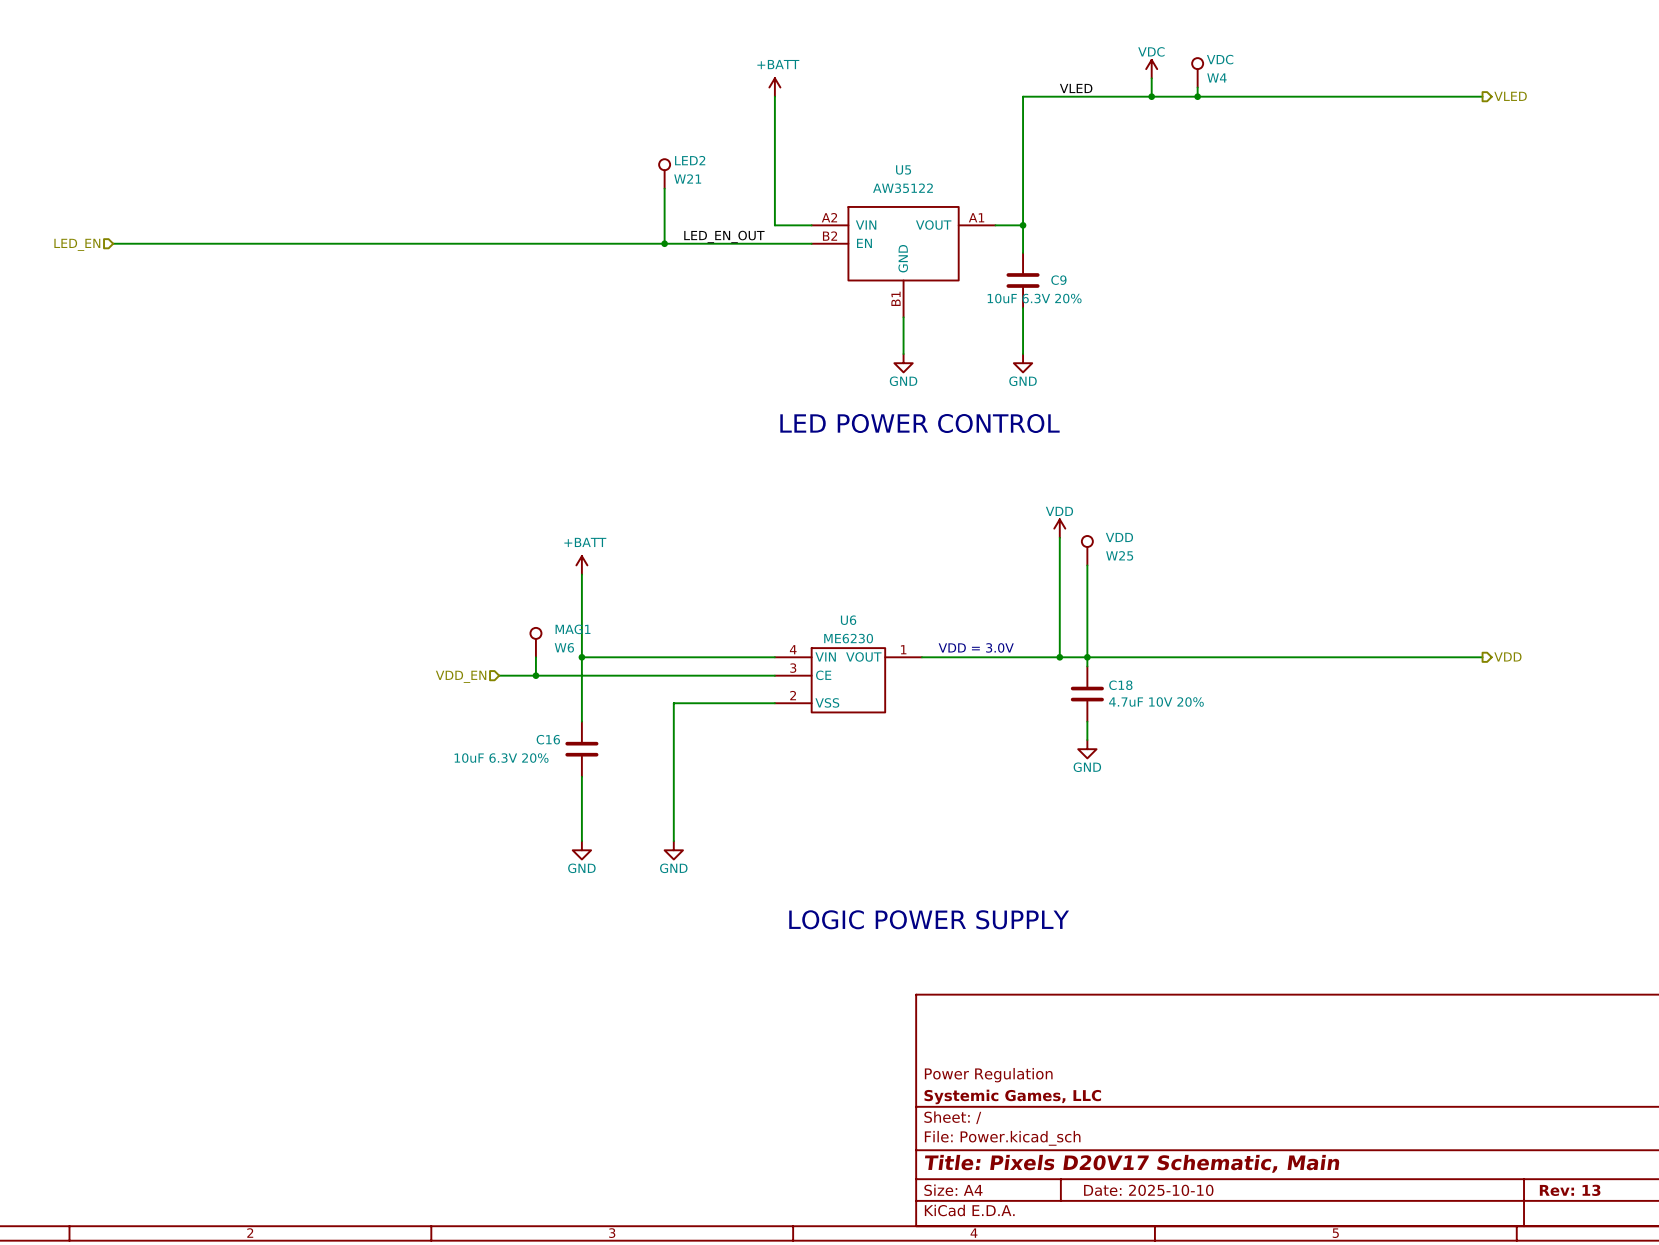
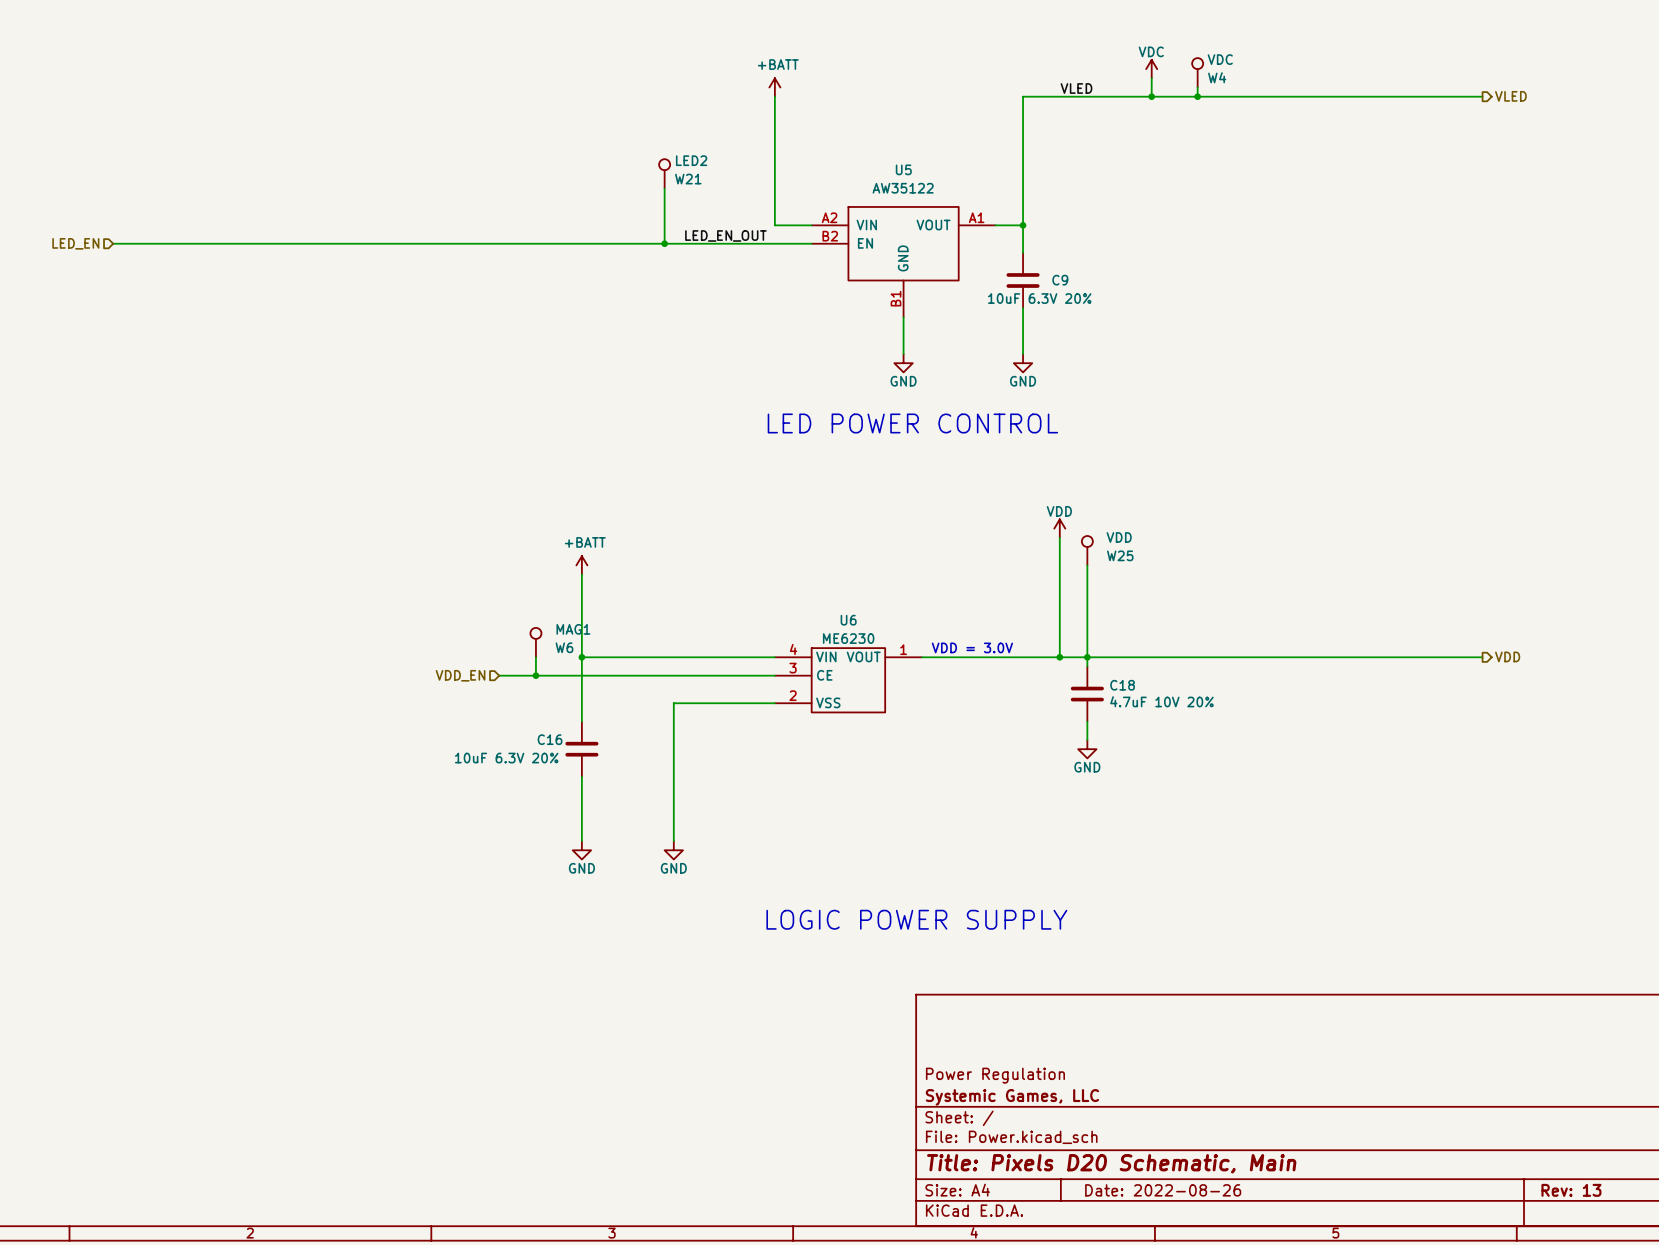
title block: Title: Pixels D20V17 Schematic, Main (1132, 1163) -> Title: Pixels D20 Schematic, Main (1111, 1163)
title block: Date: 2025-10-10 (1148, 1190) -> Date: 2022-08-26 (1163, 1190)

